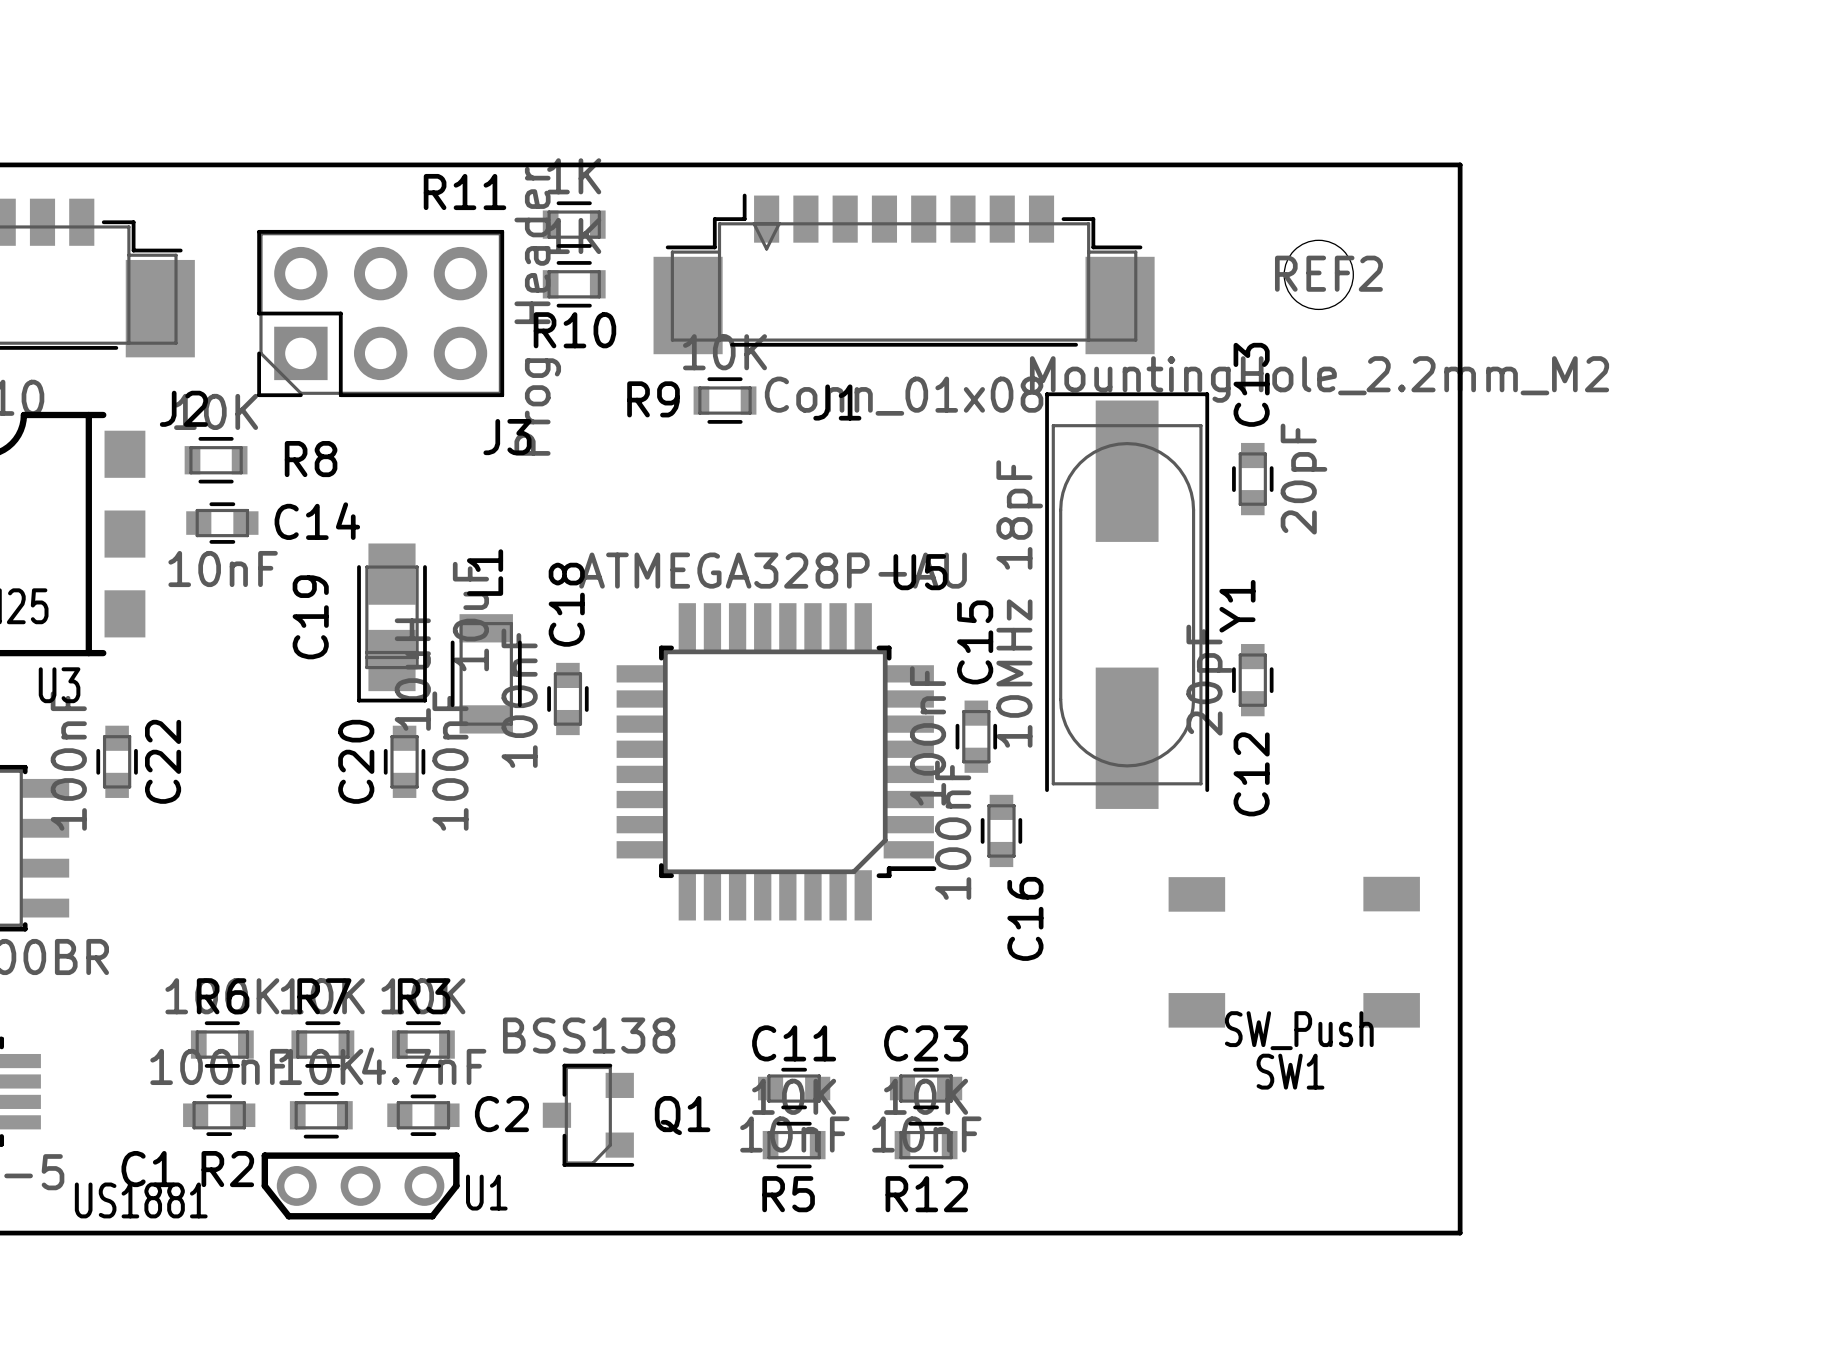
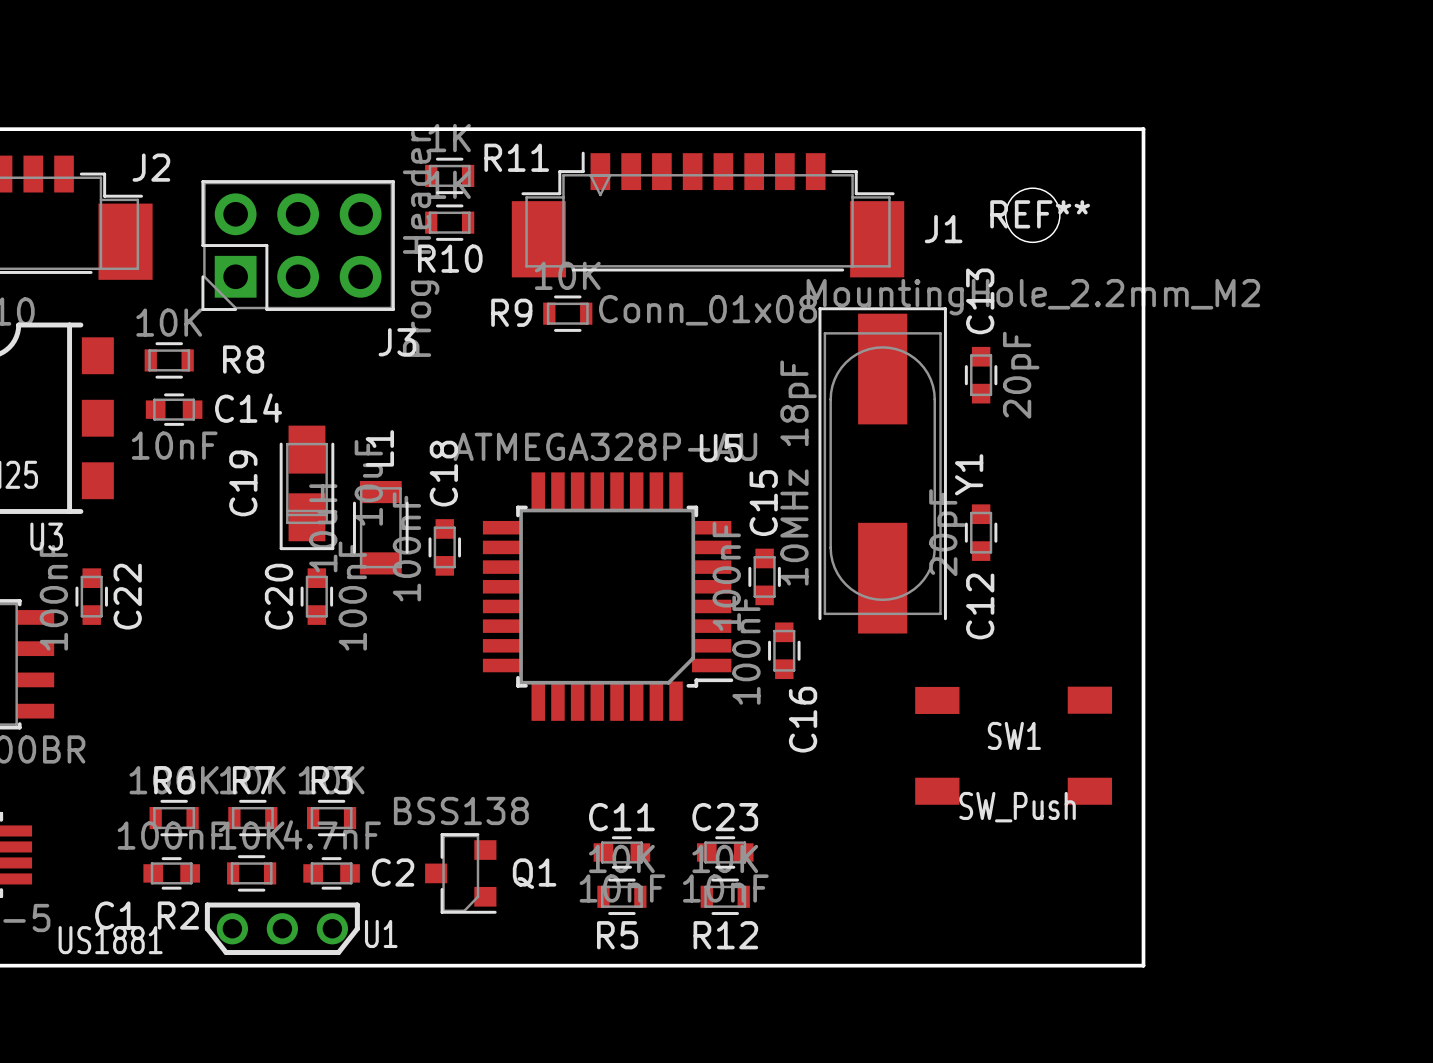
R11 name position: R11 (465, 192) -> R11 (516, 157)
REF2 name: REF2 (1328, 273) -> REF** (1040, 214)
J1 name position: J1 (837, 402) -> J1 (943, 229)
J2 name position: J2 (183, 408) -> J2 (151, 167)
SW1 name position: SW1 (1290, 1071) -> SW1 (1014, 735)

